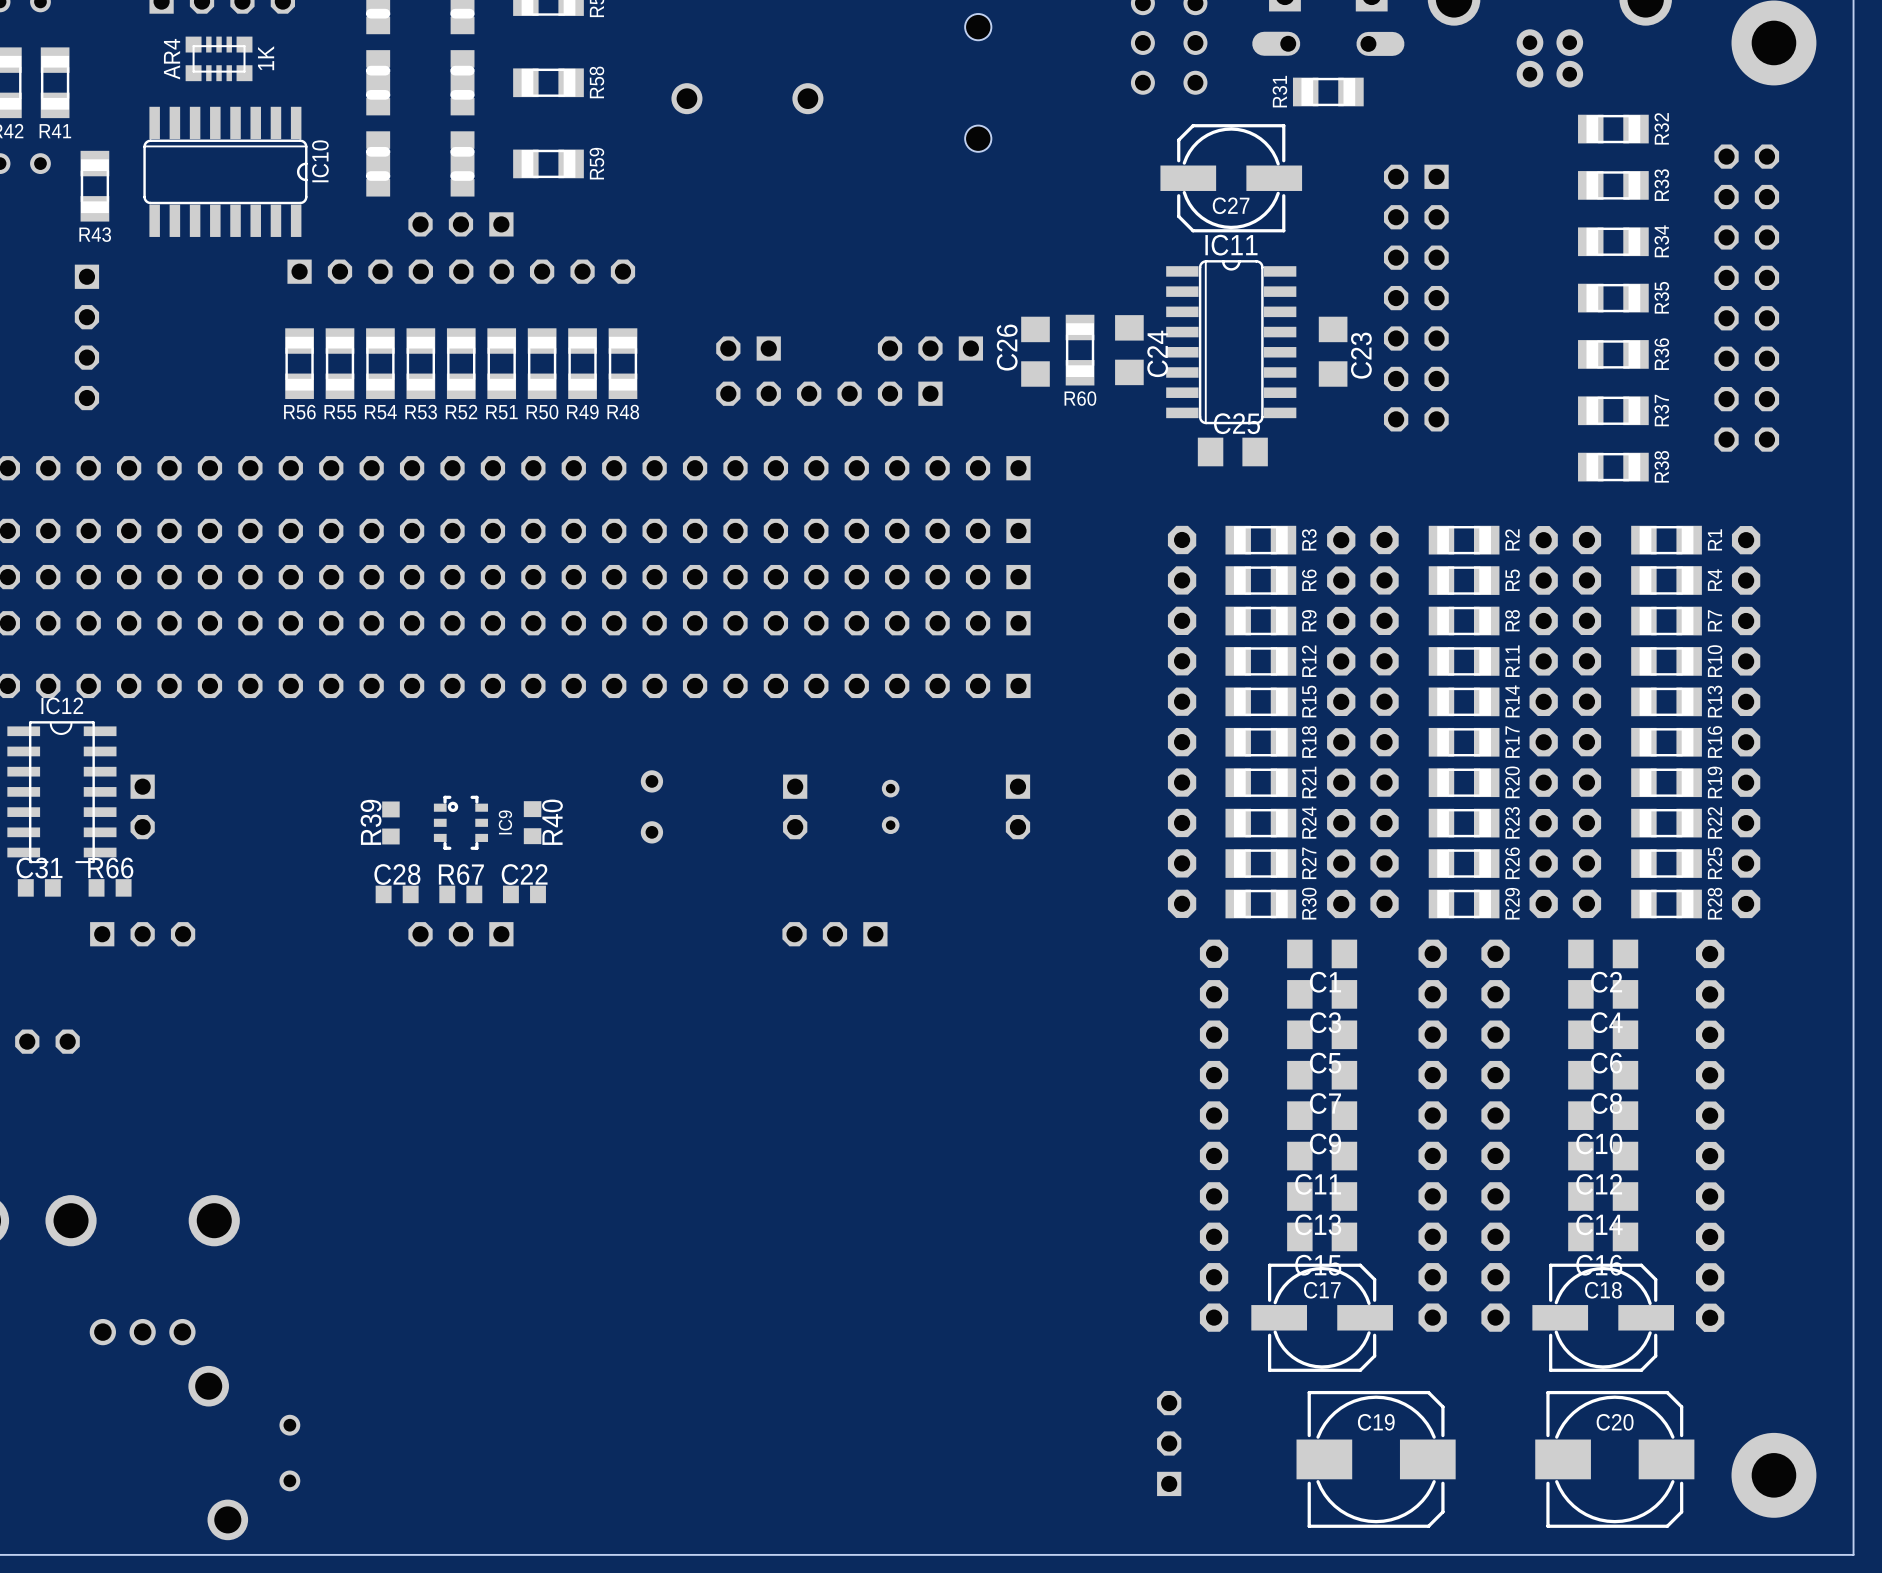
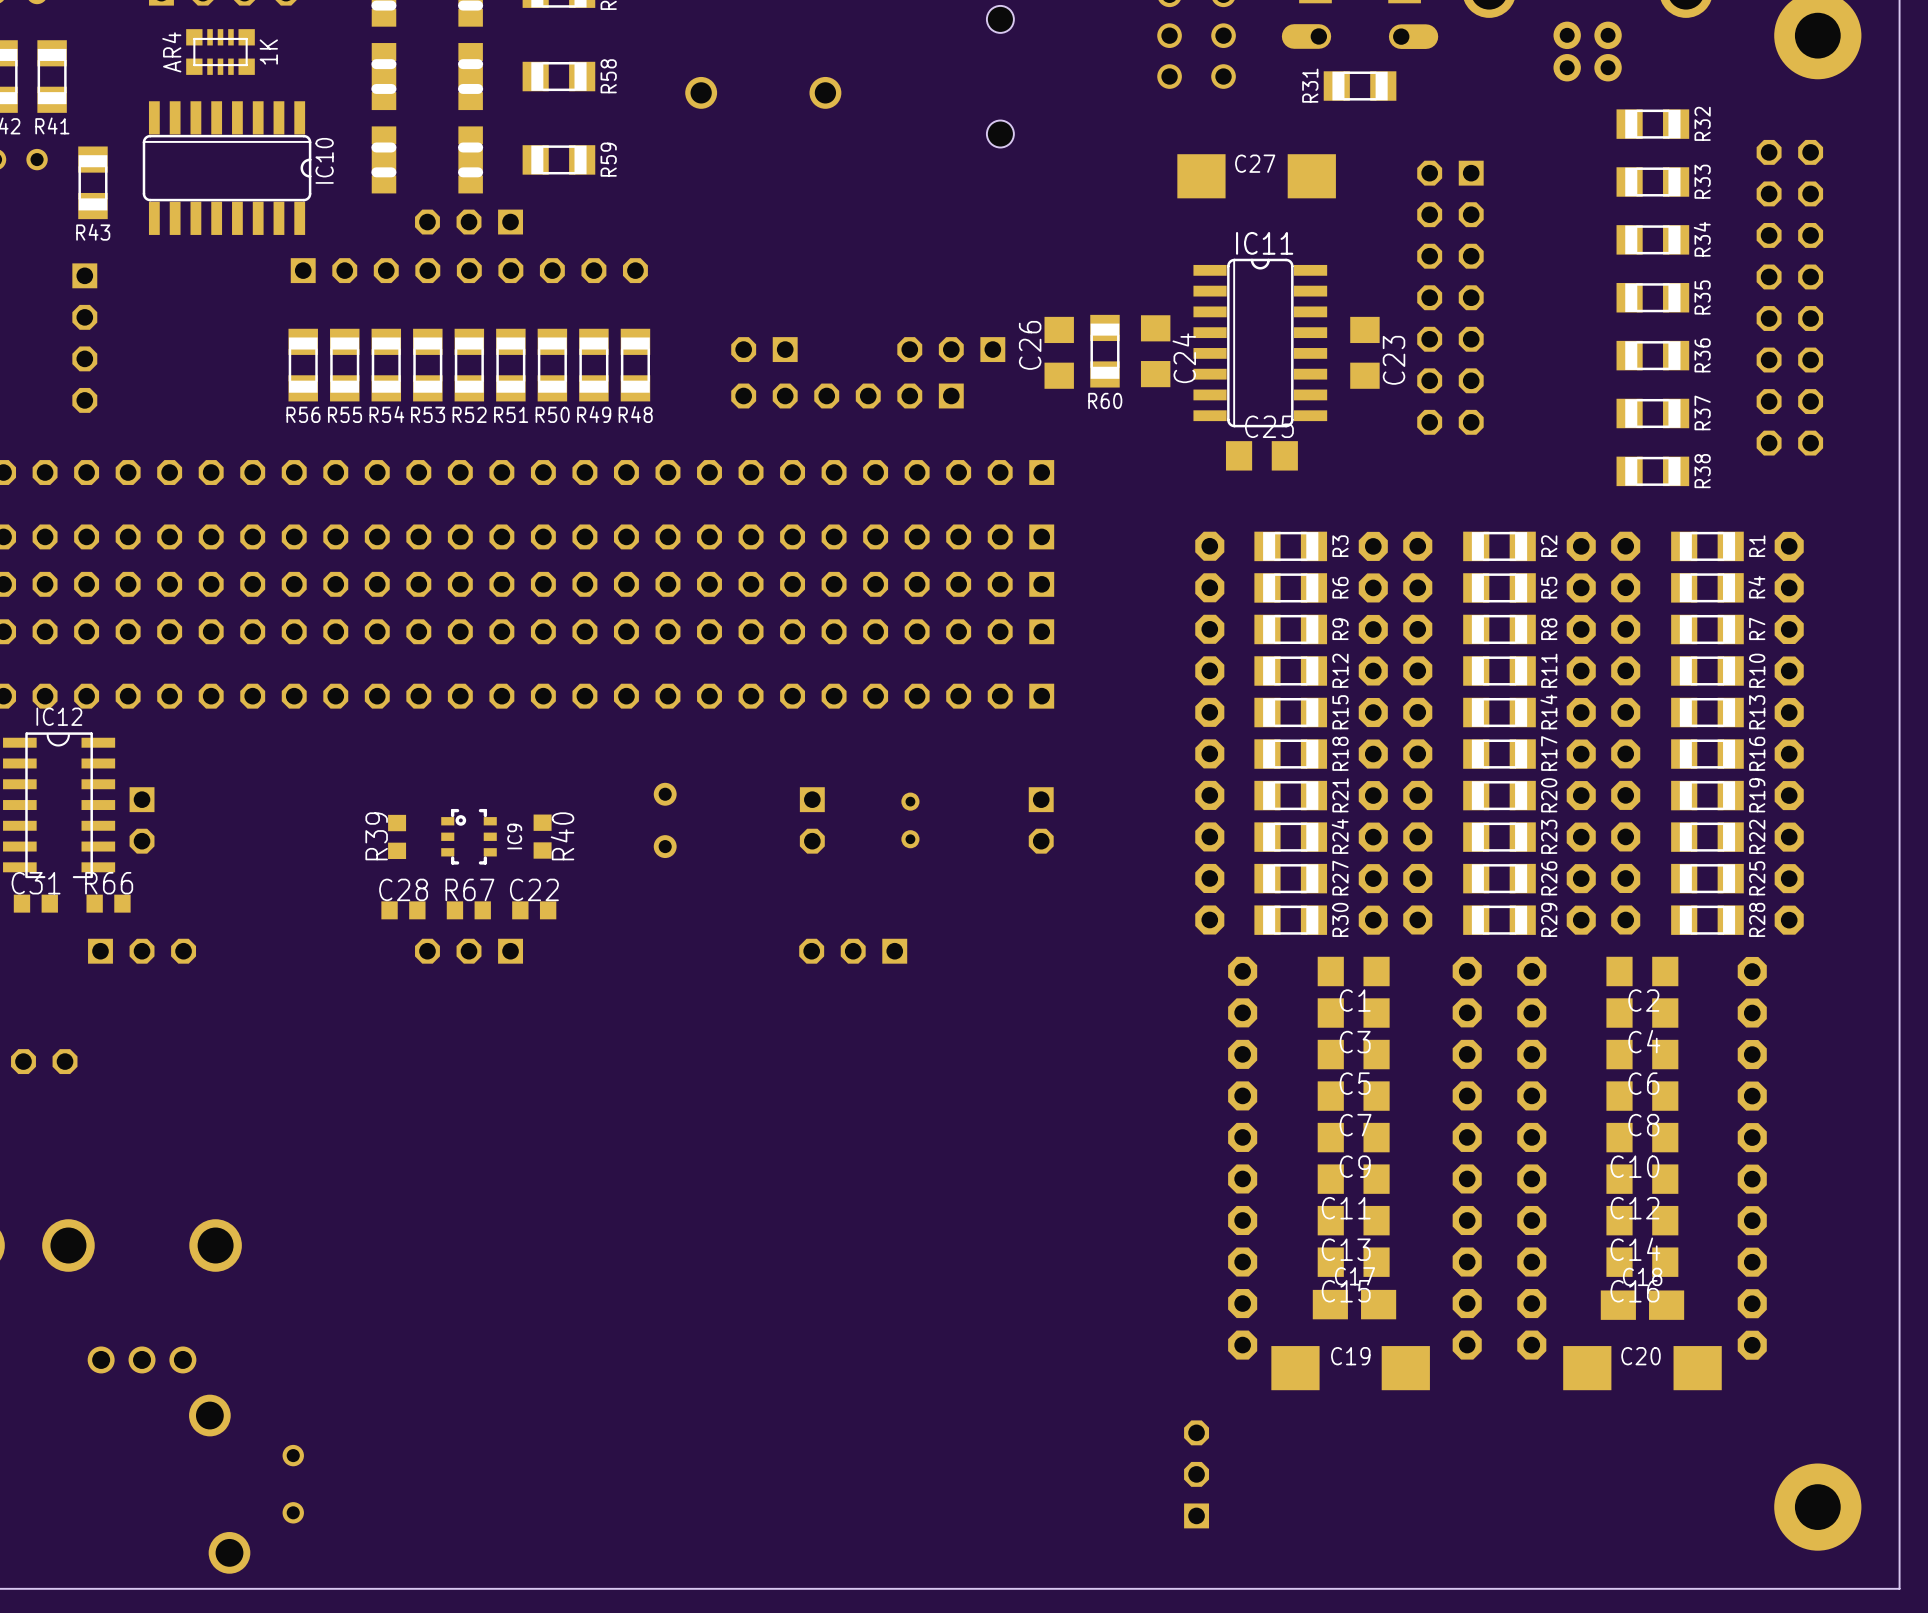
C27 footprint: [1160, 124, 1303, 233] -> [1177, 154, 1336, 199]
C27 name position: C27 (1231, 205) -> C27 (1255, 163)
C17 footprint: [1251, 1263, 1393, 1372] -> [1312, 1289, 1397, 1320]
C18 footprint: [1532, 1263, 1675, 1372] -> [1600, 1290, 1685, 1320]
C19 footprint: [1296, 1390, 1456, 1528] -> [1271, 1346, 1430, 1391]
C20 footprint: [1535, 1390, 1695, 1528] -> [1563, 1346, 1722, 1391]

